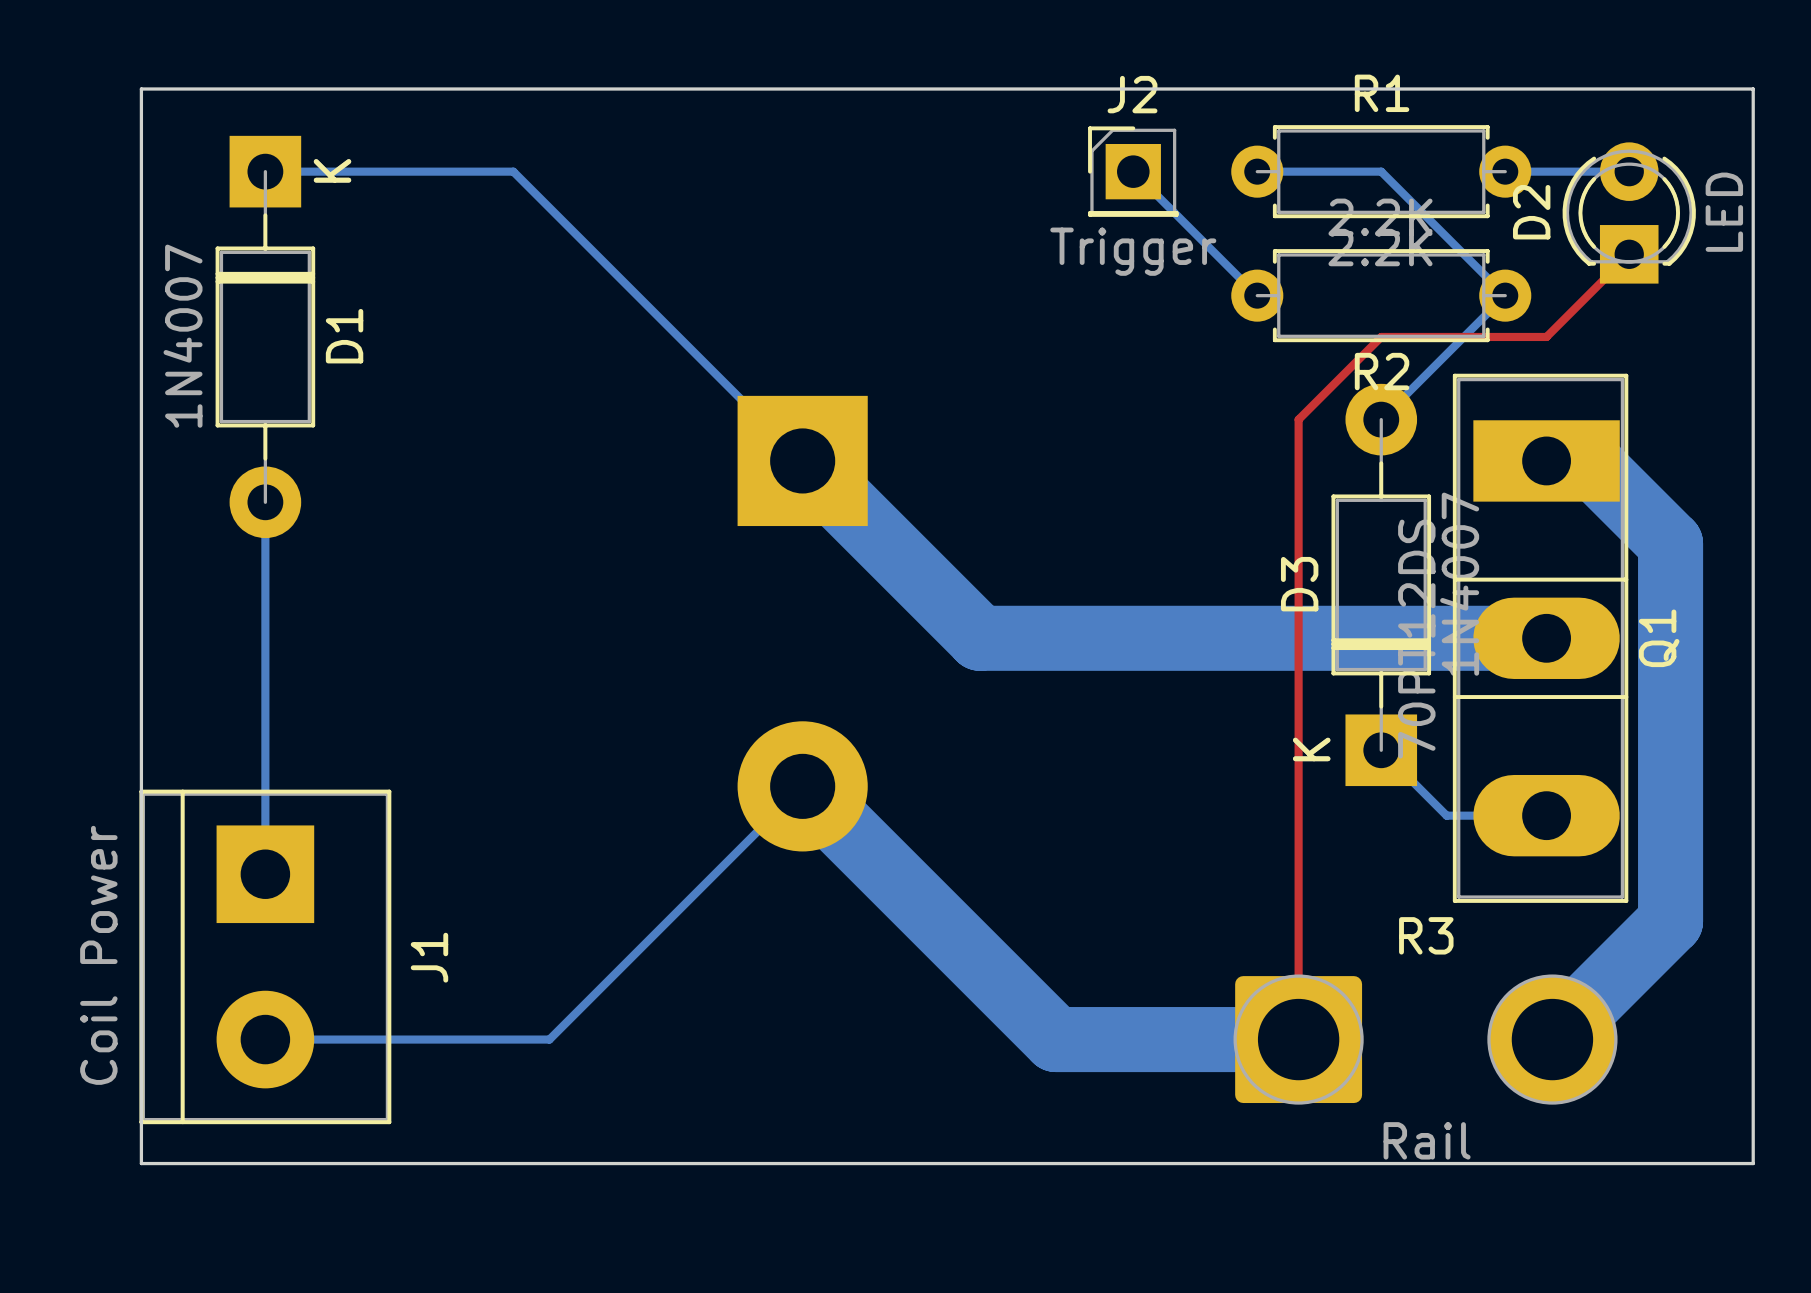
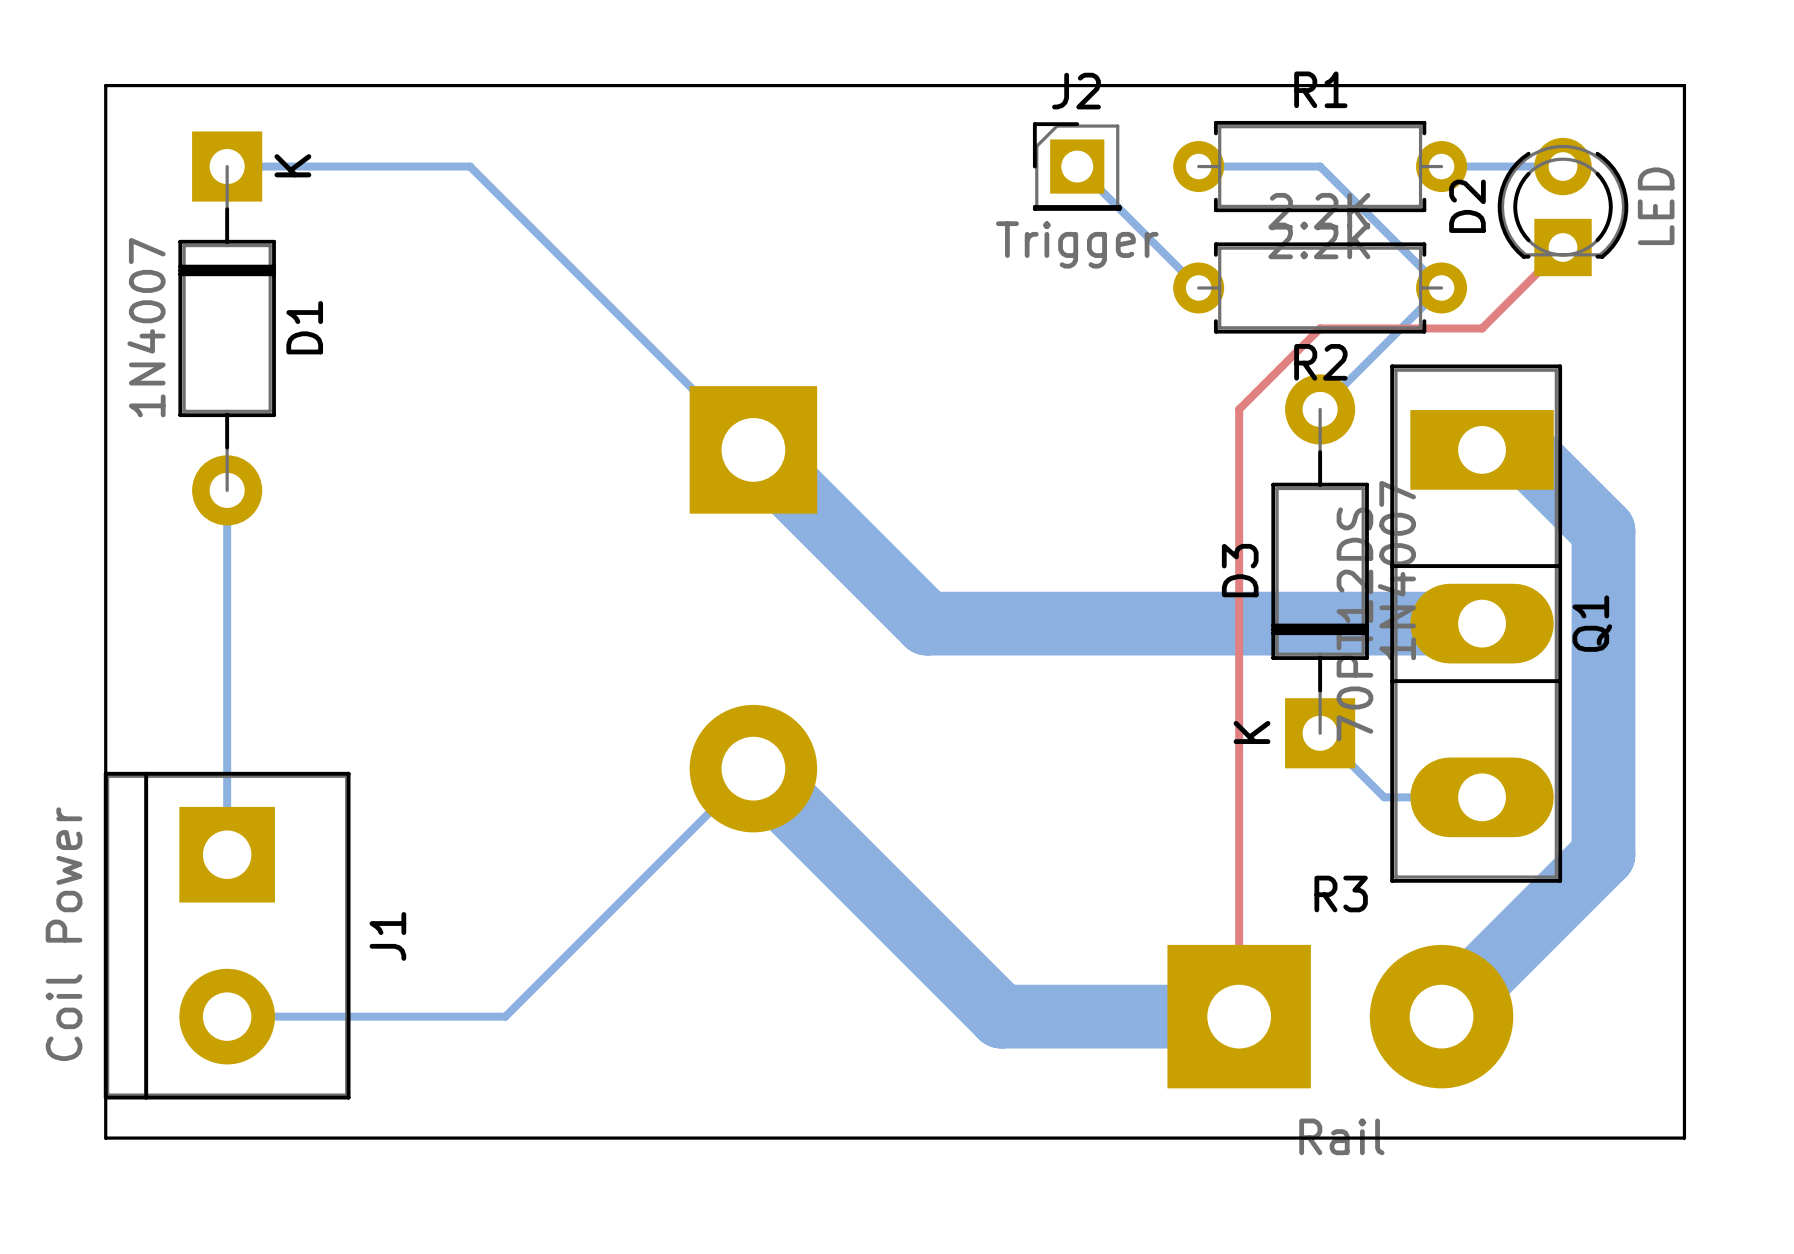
bottom track: (1670, 874) (1670, 921) (1552, 1039) -> (1603, 854) (1441, 1016)
R3 footprint: [1233, 974, 1618, 1105] -> [1167, 944, 1514, 1089]

